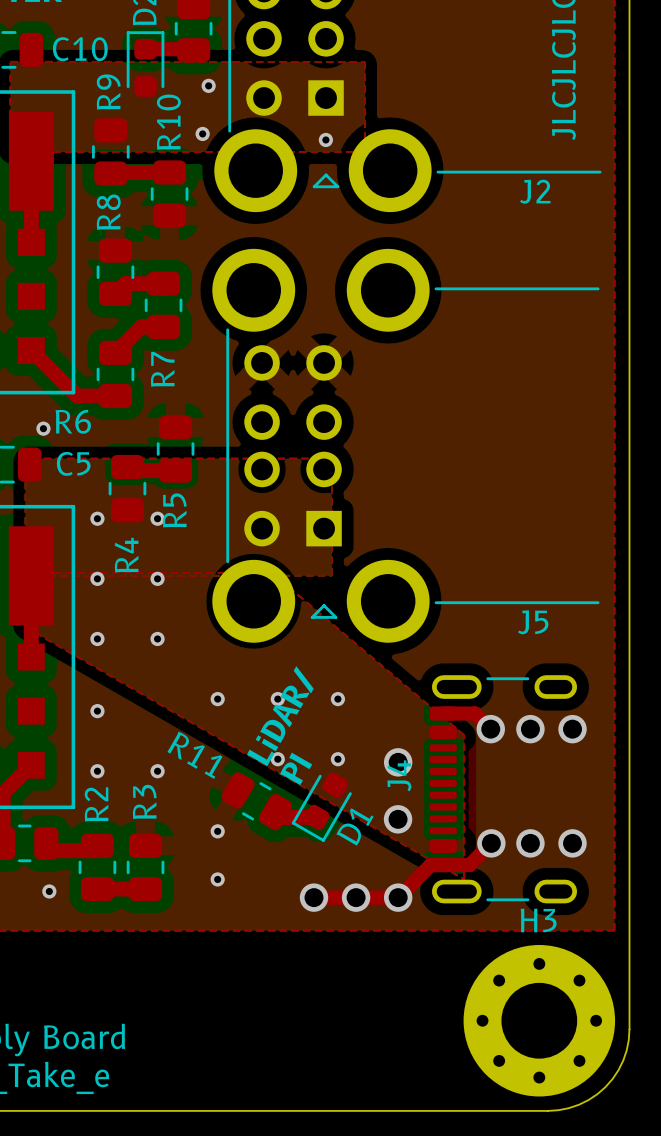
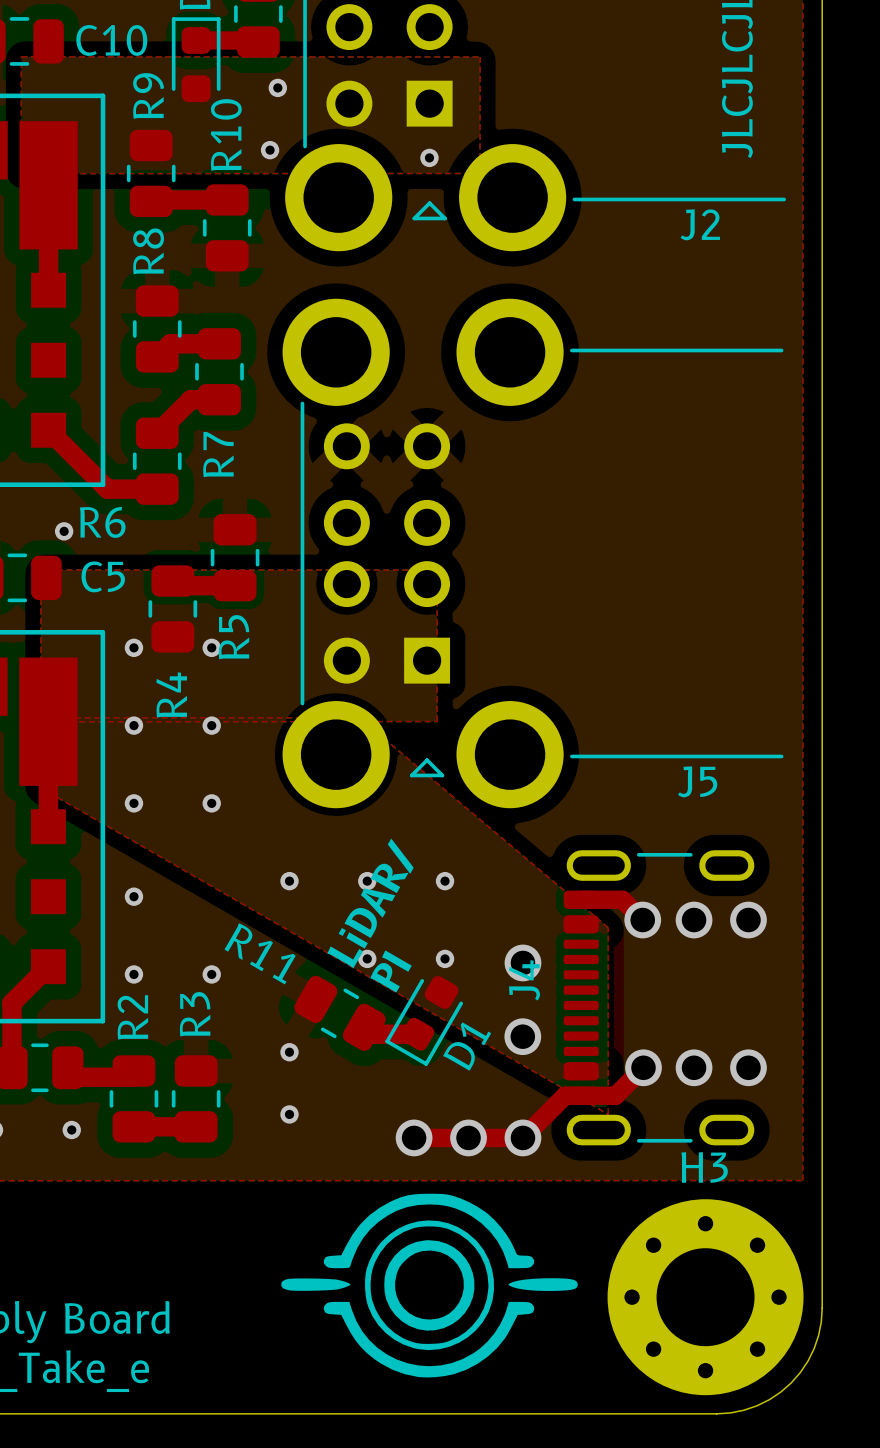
drawing: none -> [281, 1193, 578, 1378]

